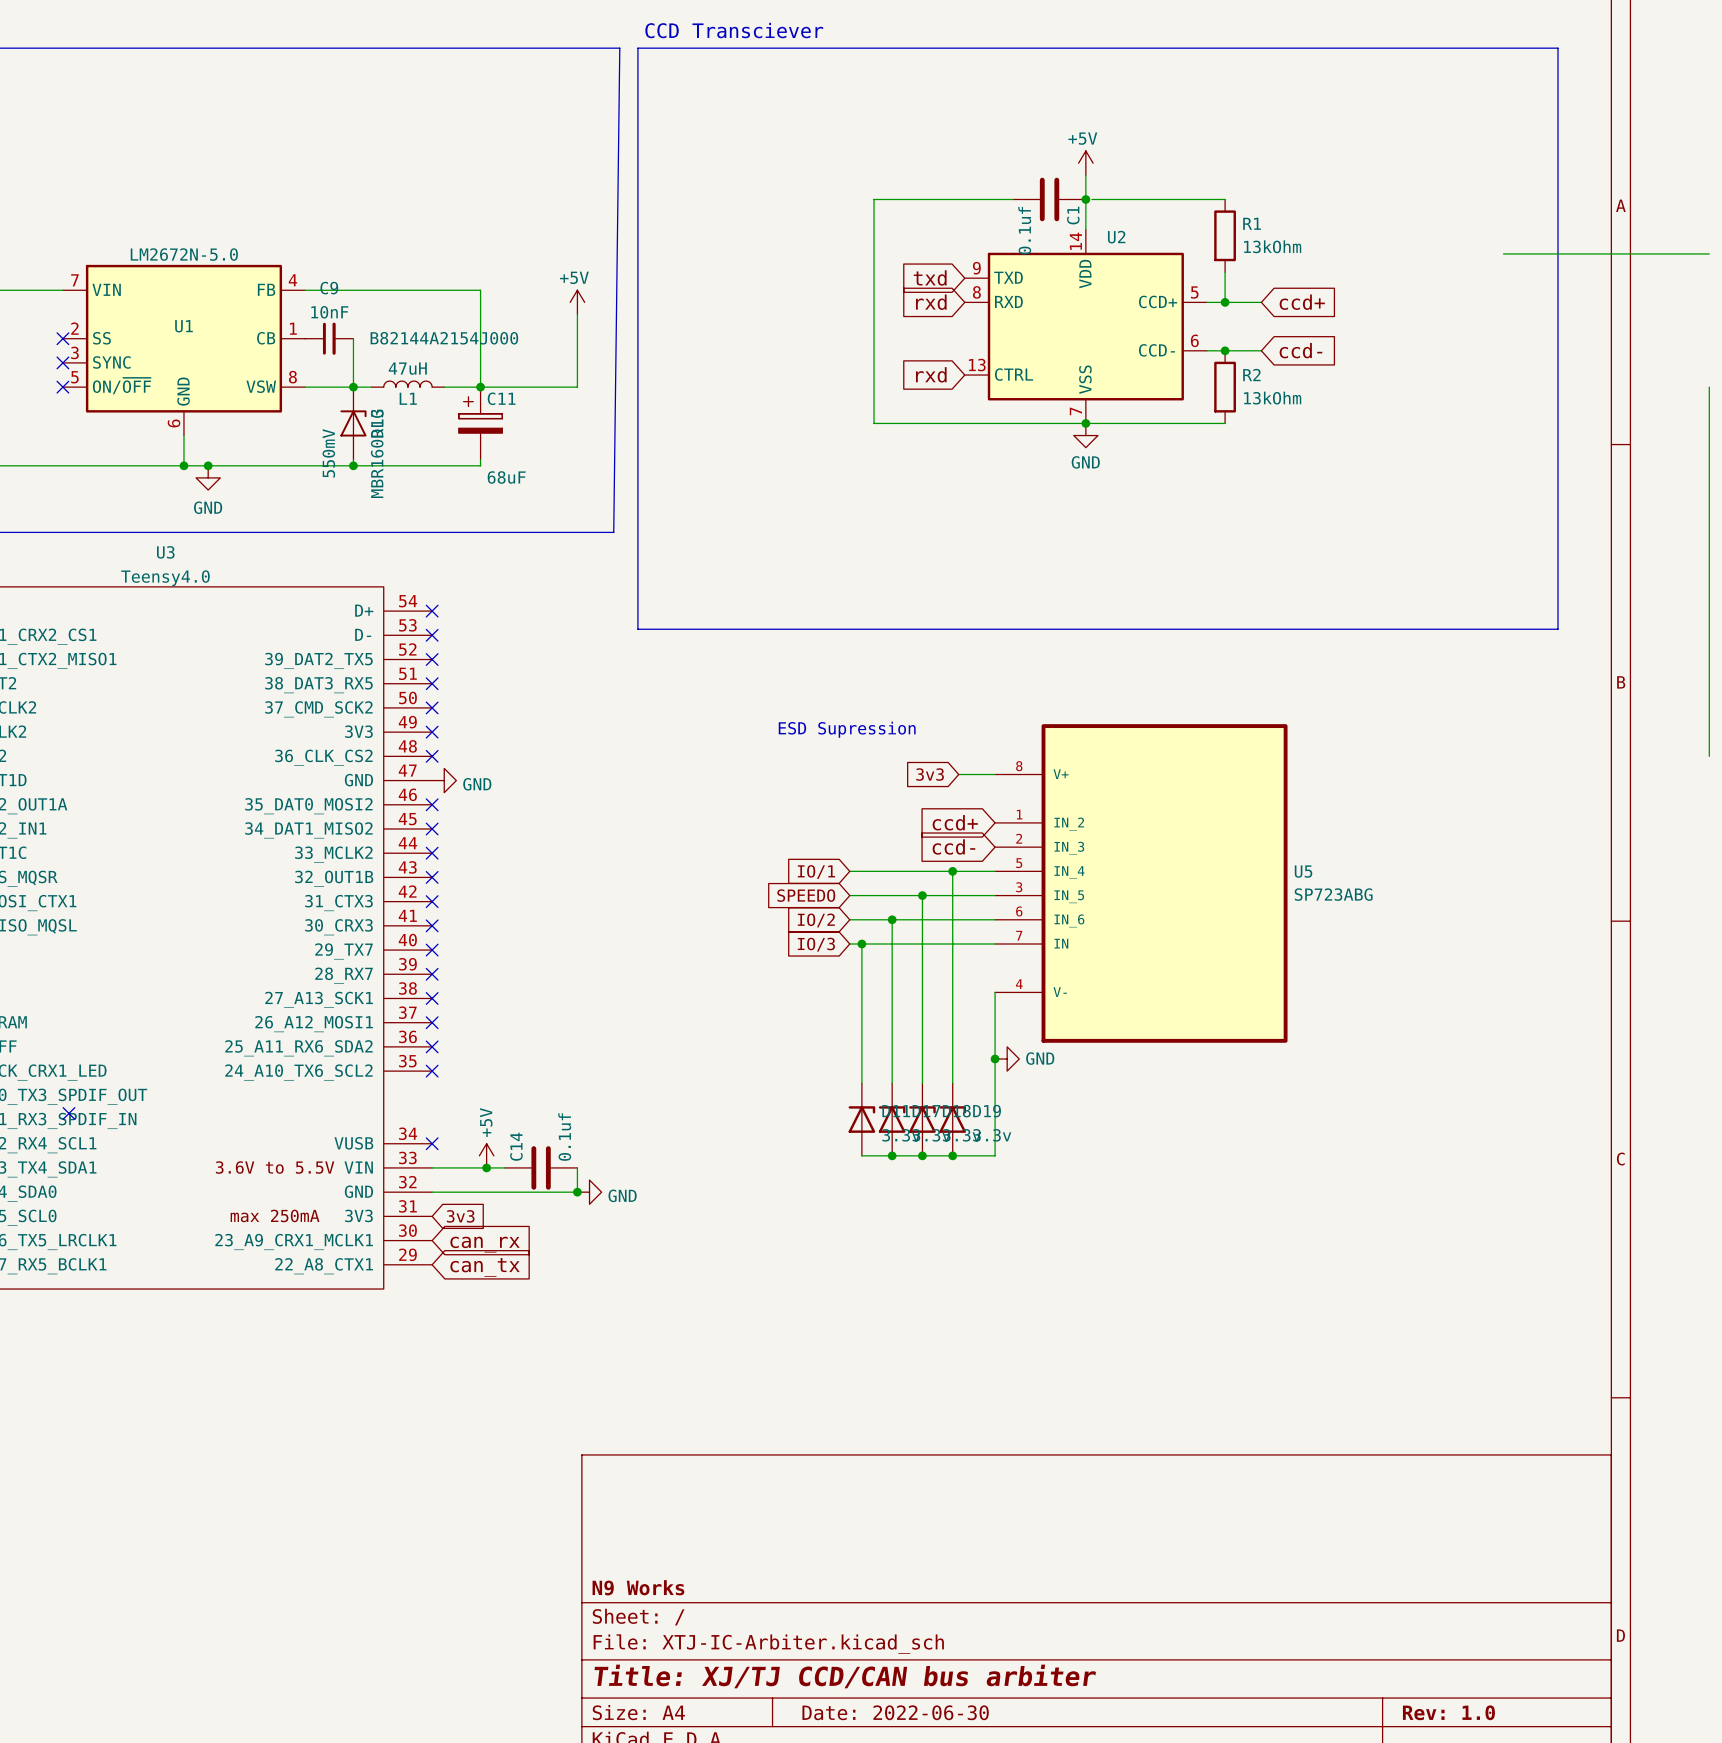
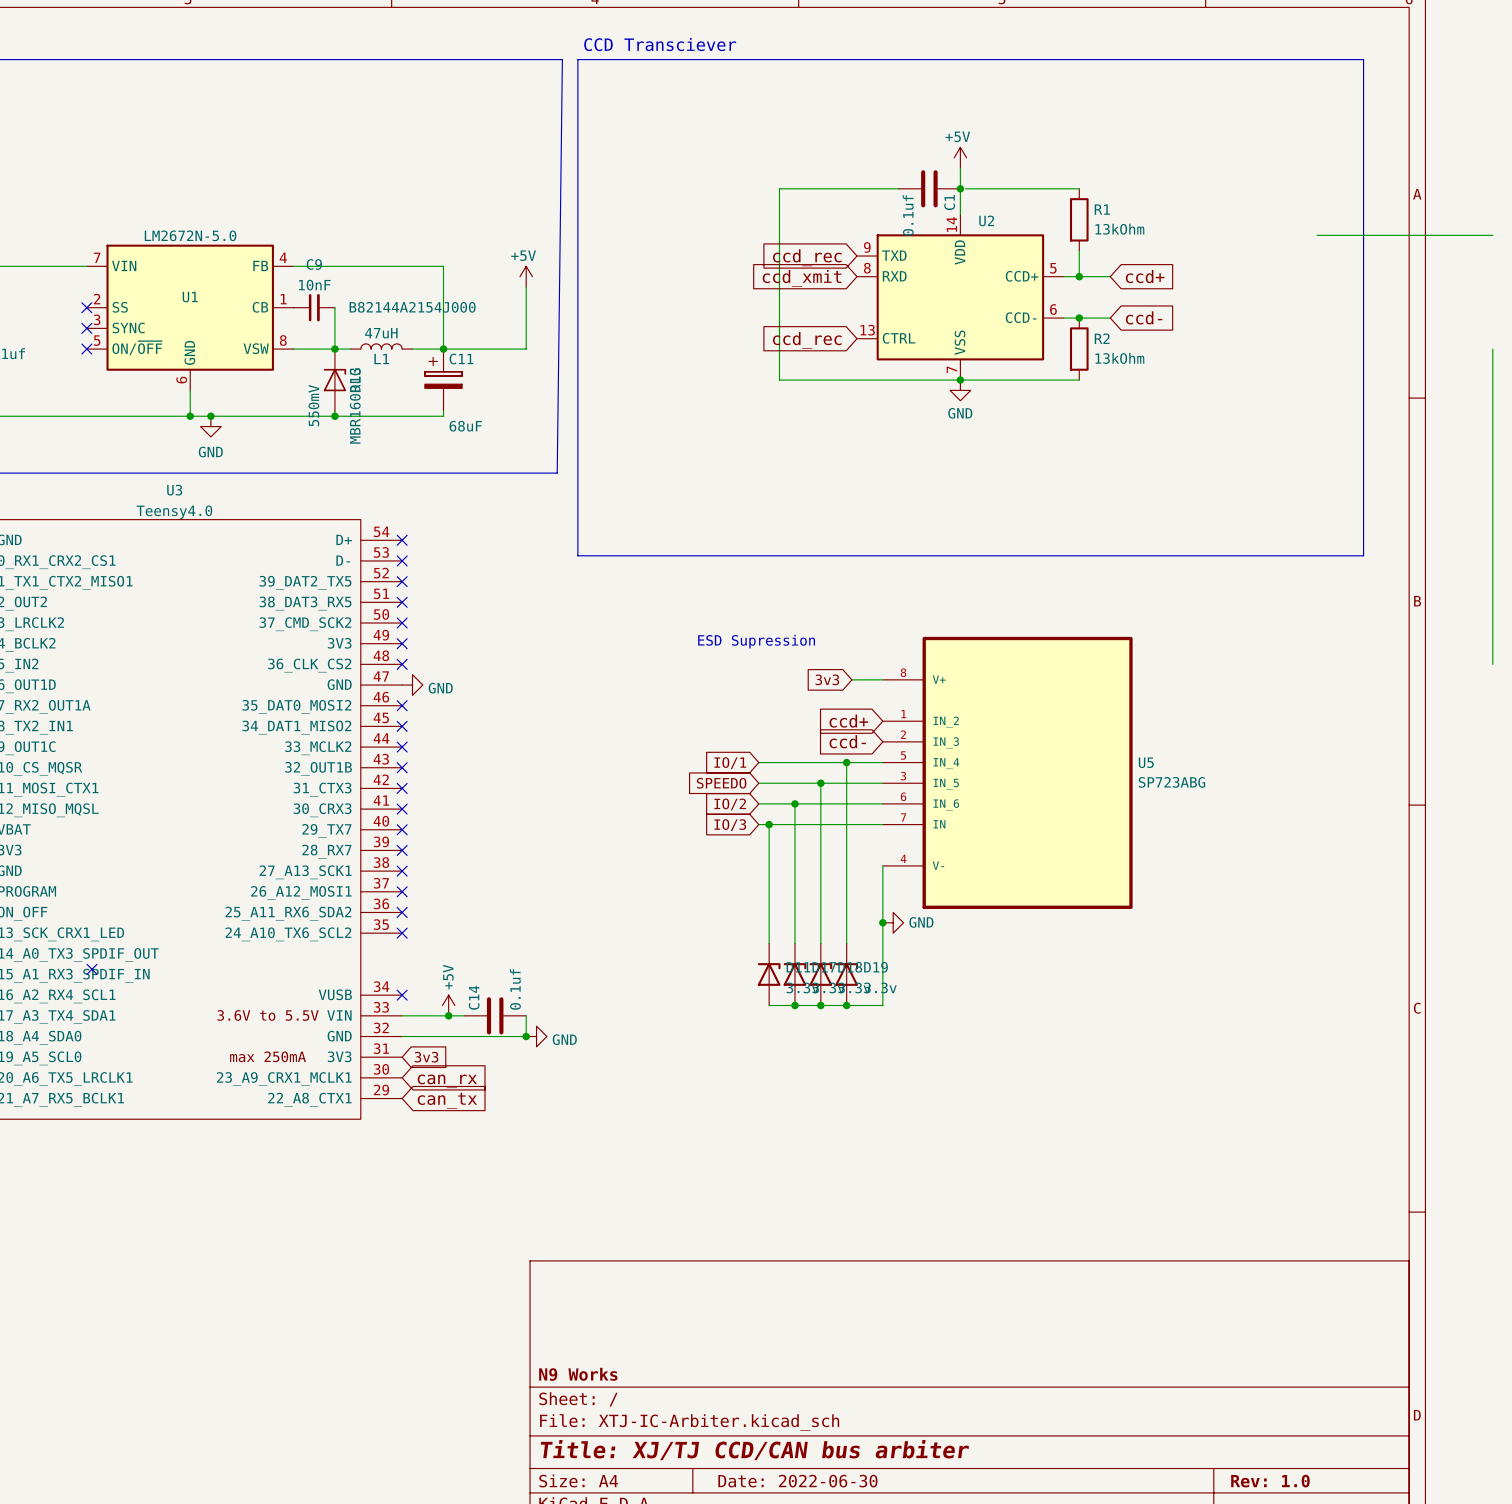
global label: txd (930, 278) -> ccd_rec (807, 257)
global label: rxd (931, 302) -> ccd_xmit (802, 278)
global label: rxd (931, 374) -> ccd_rec (807, 340)

